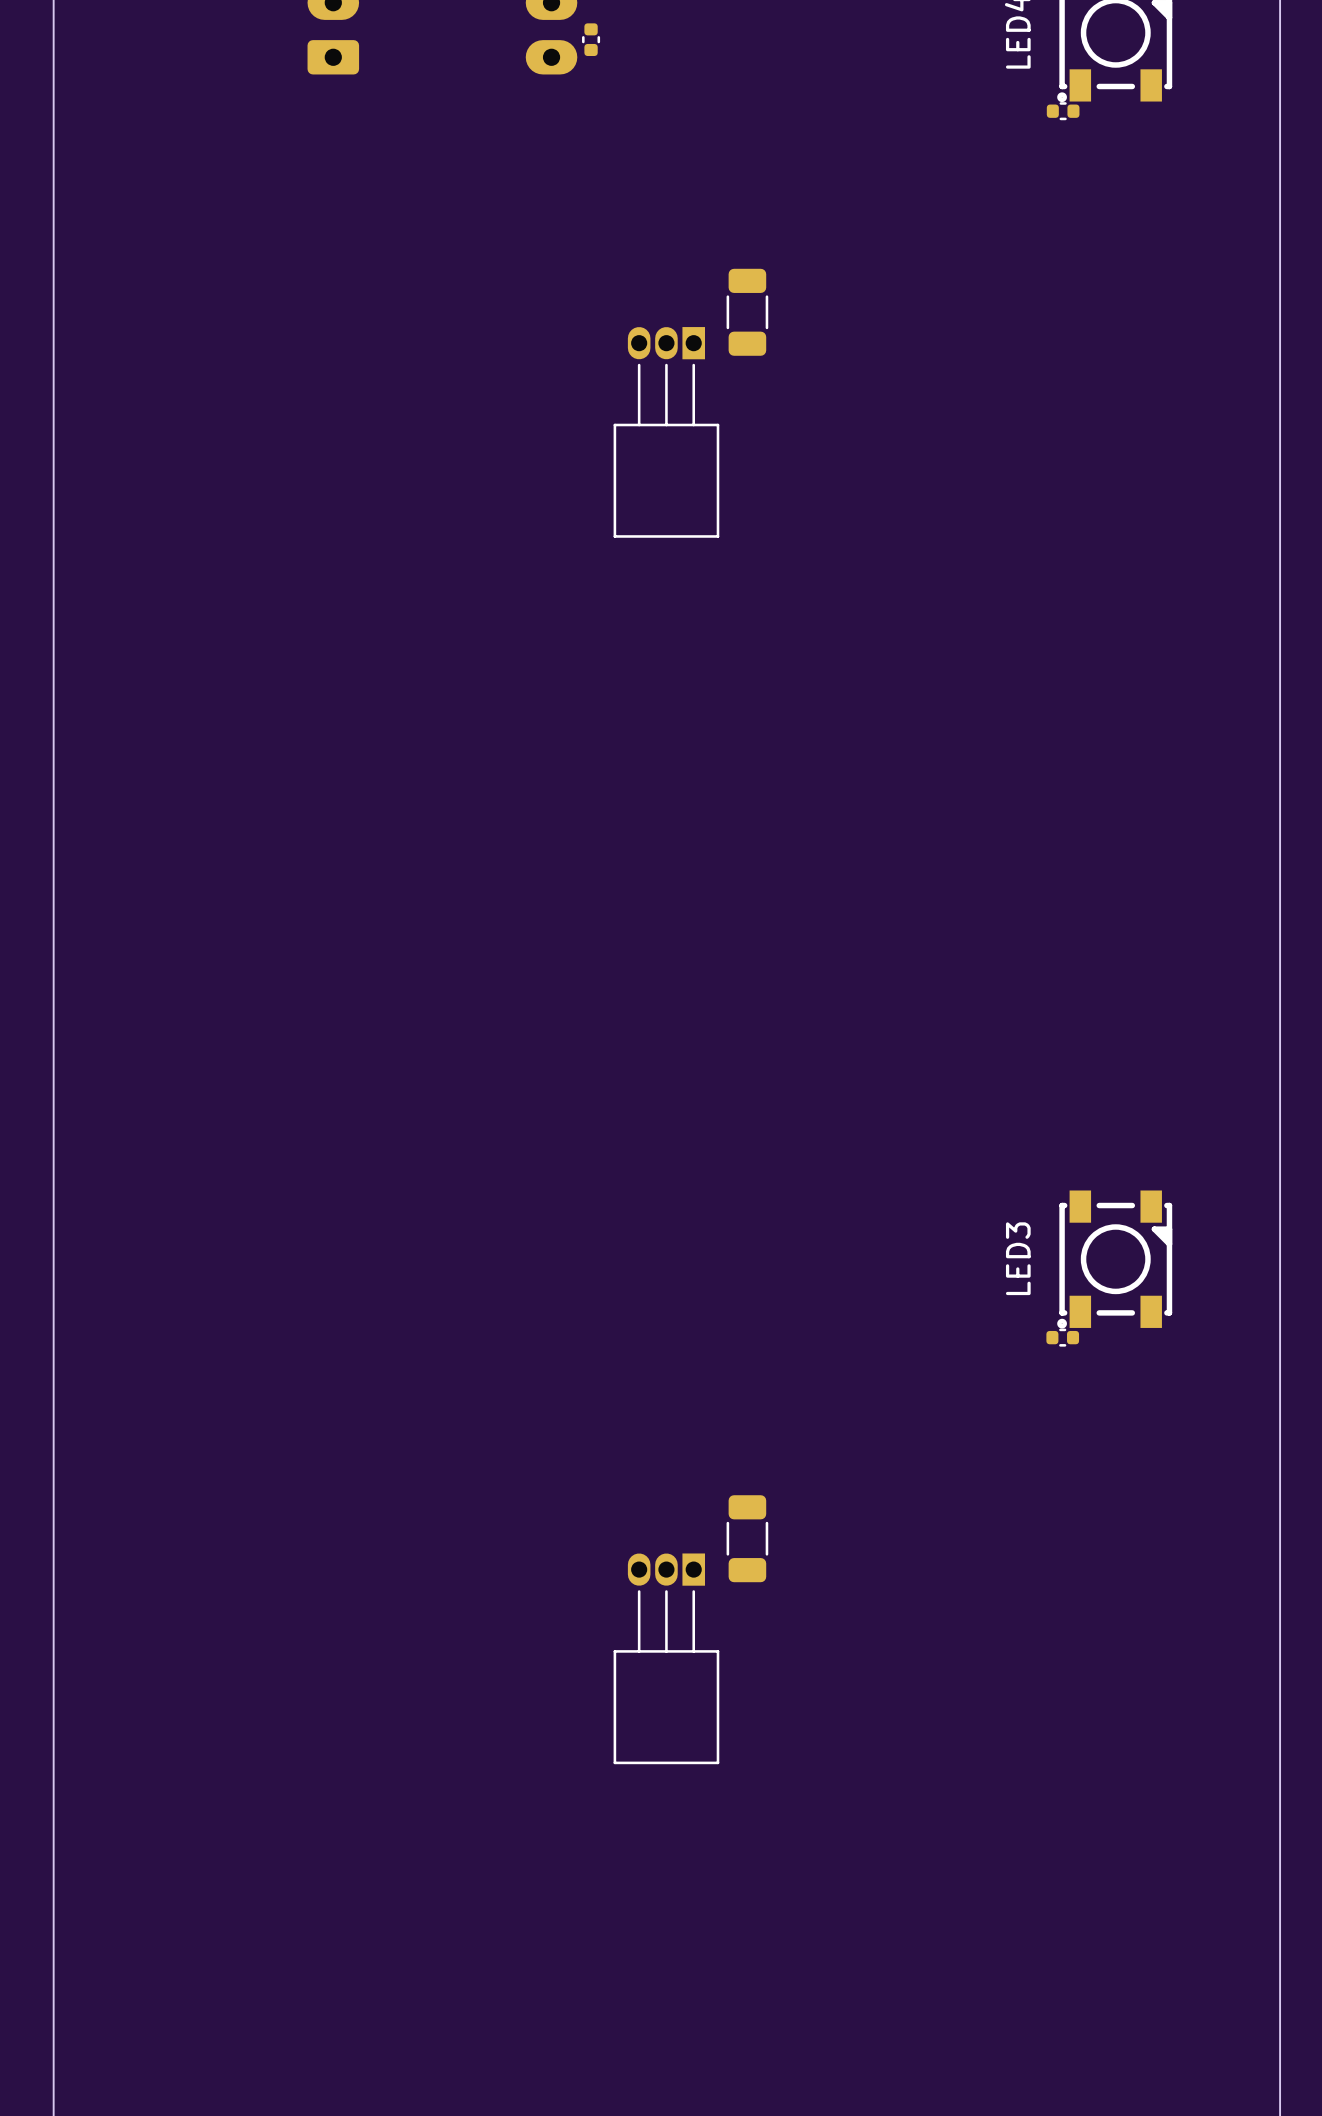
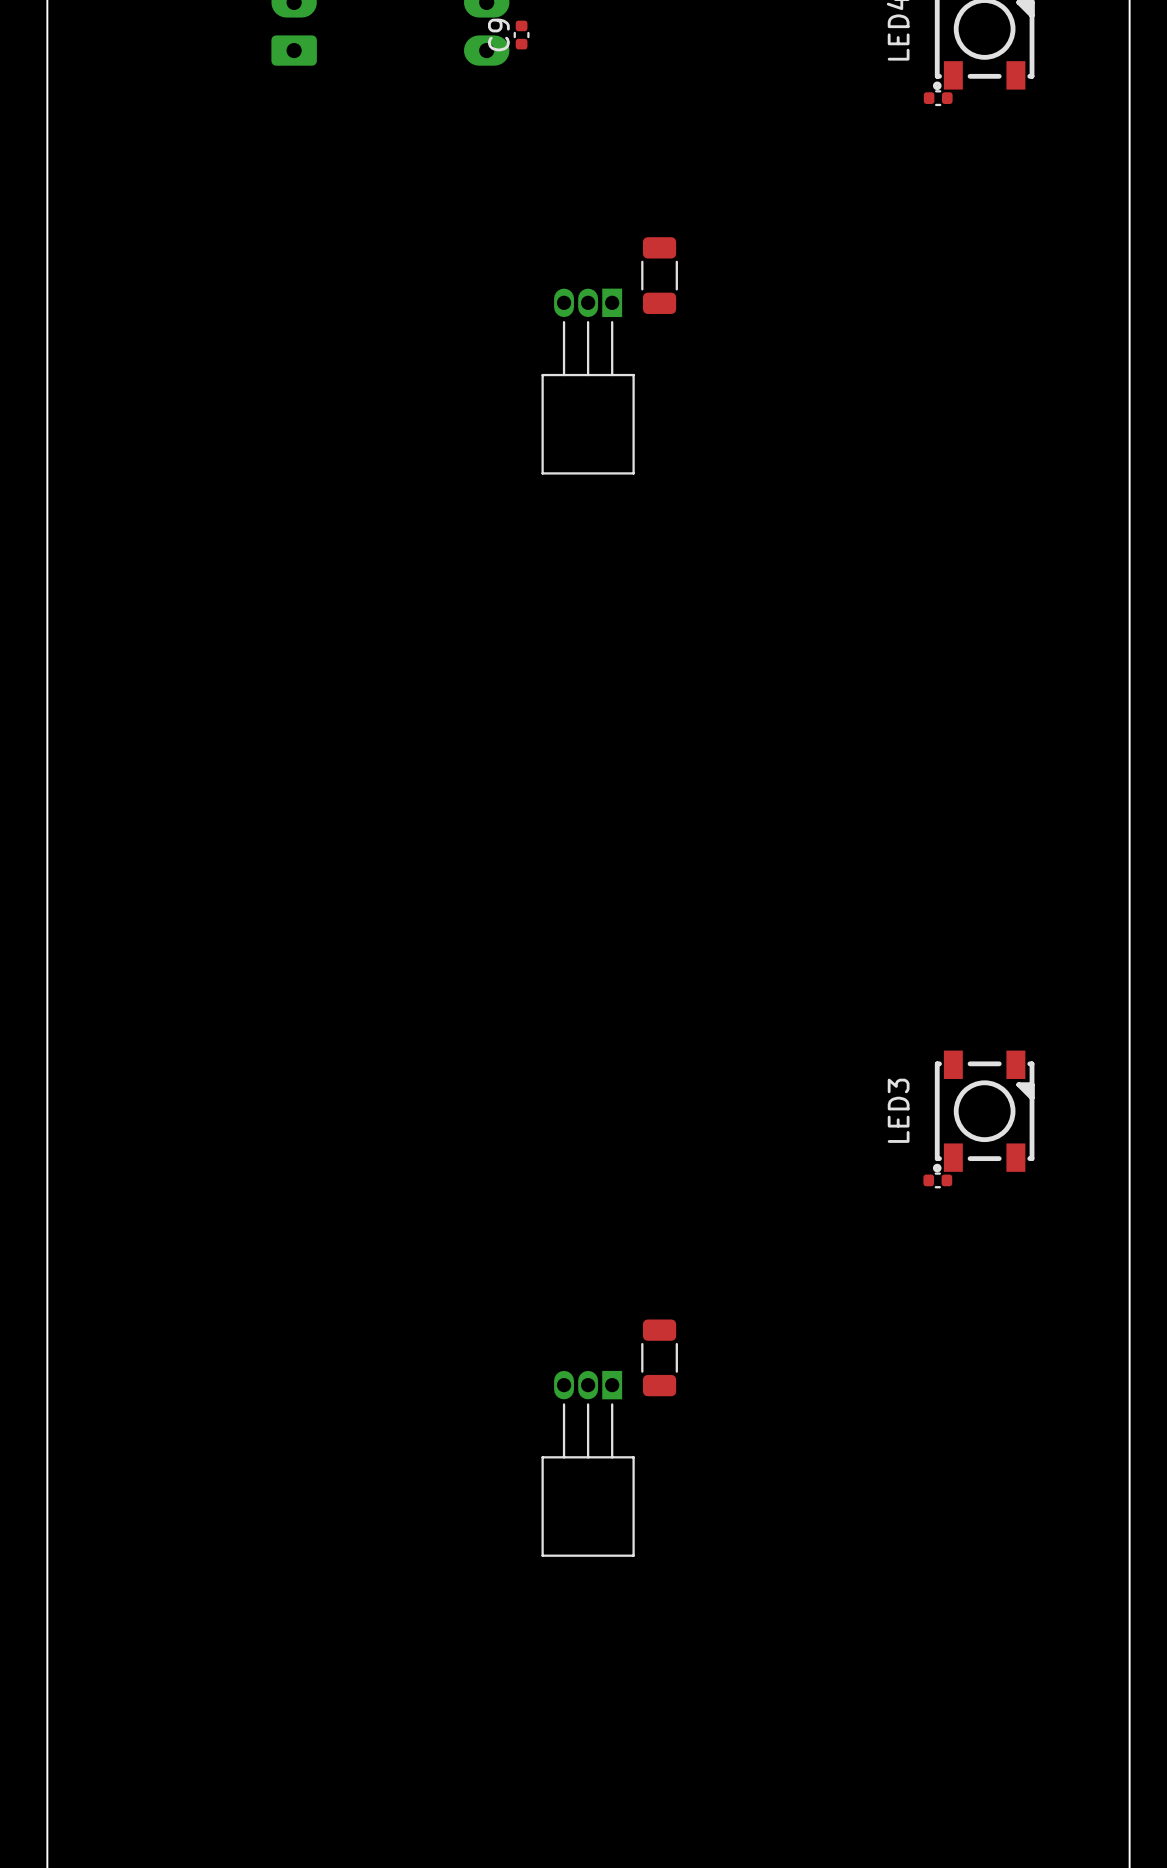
C9 name: none -> C9 (498, 35)

